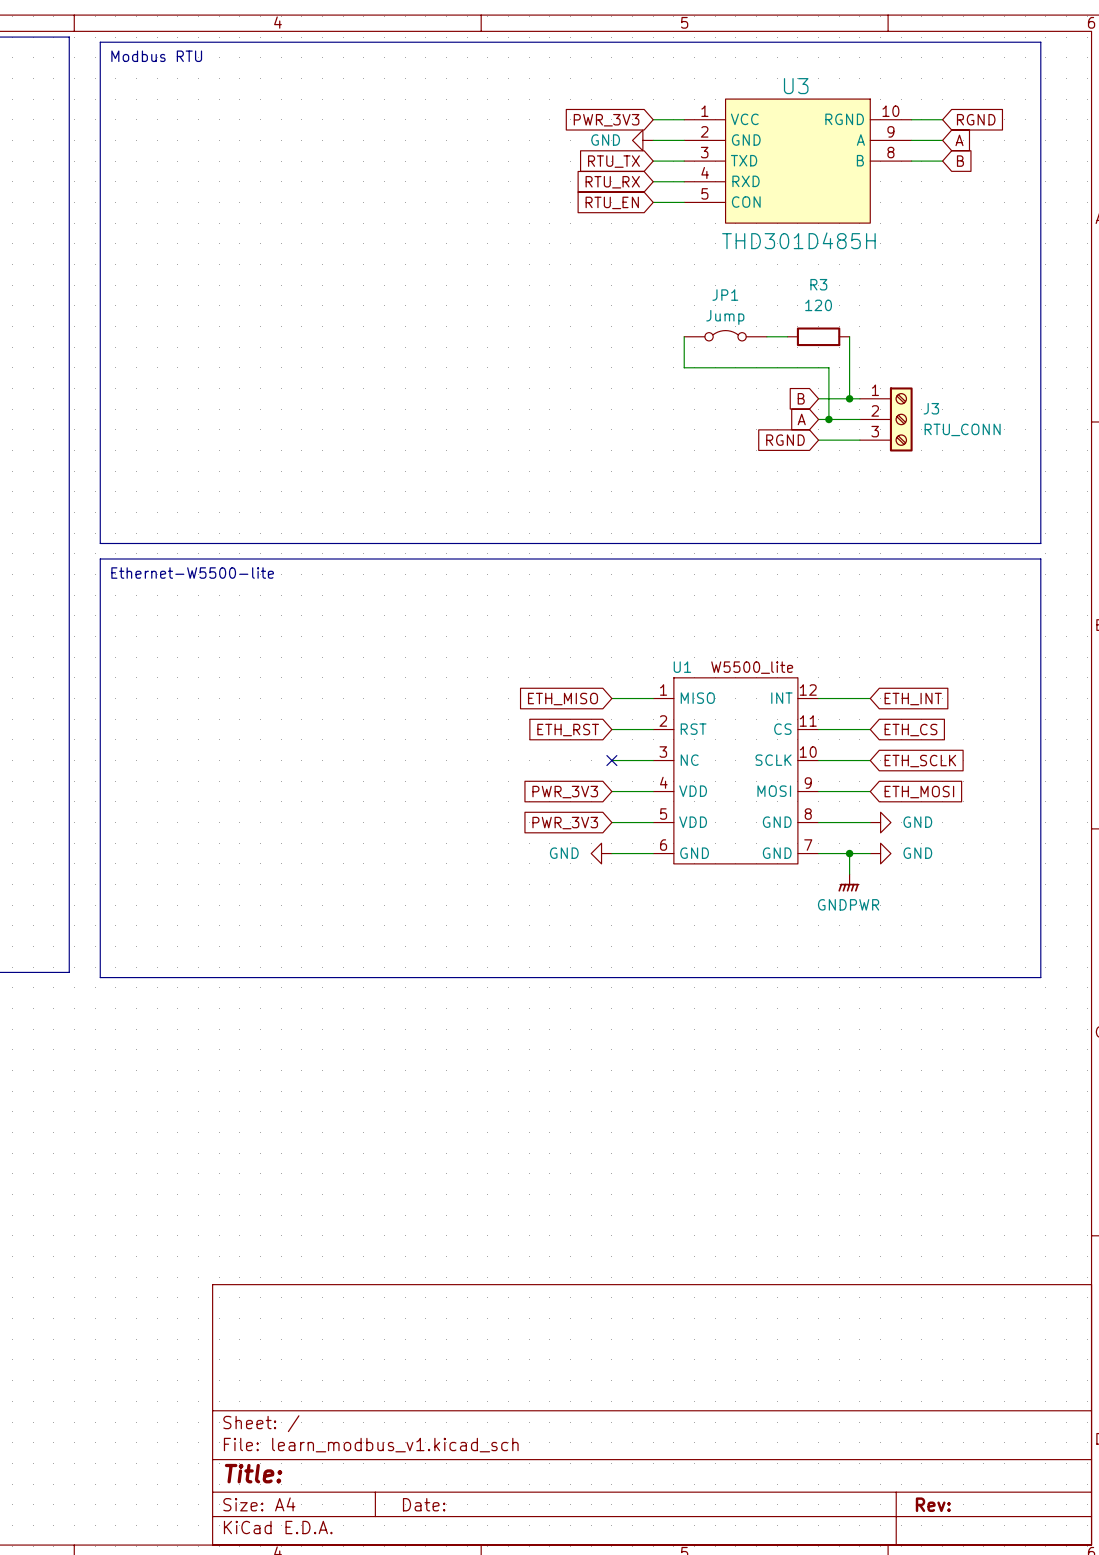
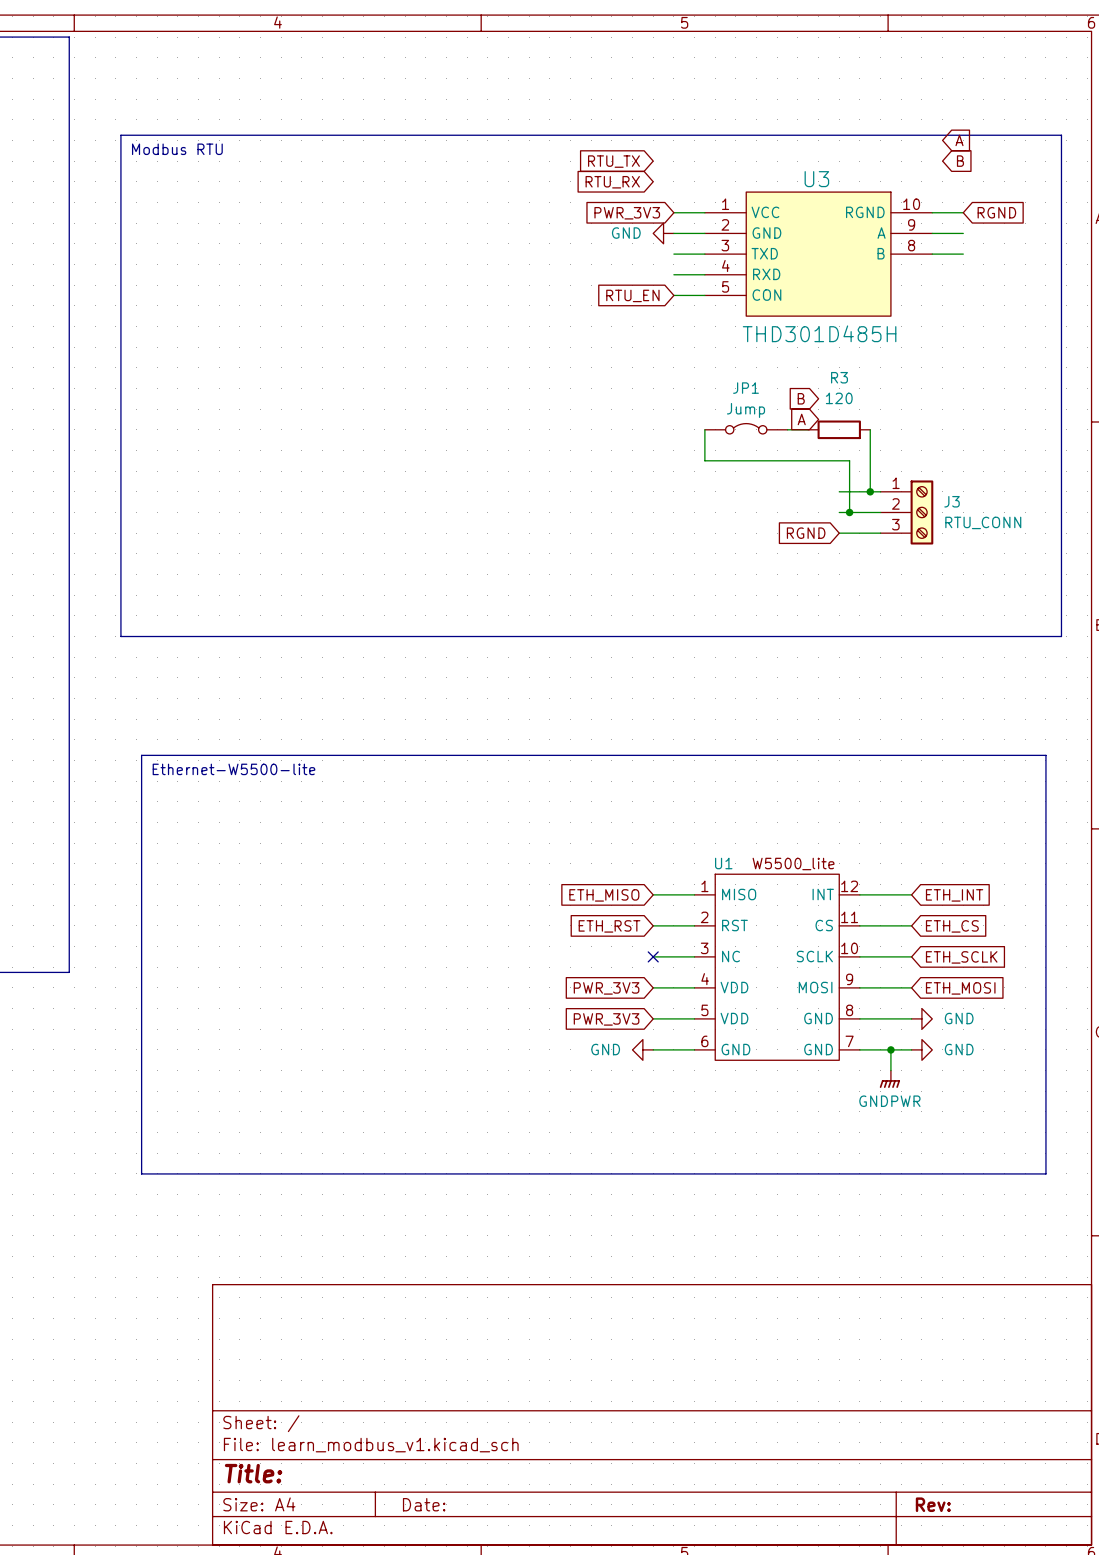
line: (100, 42) (100, 543) (1040, 543) (1040, 42) (100, 42) -> (120, 135) (120, 636) (1061, 636) (1061, 135) (120, 135)
text position: Modbus RTU (156, 56) -> Modbus RTU (177, 149)
wire: (653, 119) (684, 119) -> (673, 212) (704, 212)
wire: (911, 119) (942, 119) -> (932, 212) (963, 212)
global label position: RGND (976, 119) -> RGND (996, 212)
global label position: PWR_3V3 (606, 120) -> PWR_3V3 (627, 213)
power symbol position: GND (642, 140) -> GND (663, 233)
wire: (653, 140) (684, 140) -> (673, 233) (704, 233)
wire: (911, 140) (942, 140) -> (932, 233) (963, 233)
wire: (653, 161) (684, 161) -> (673, 254) (704, 254)
U3 position: (797, 161) -> (818, 254)
wire: (911, 161) (942, 161) -> (932, 254) (963, 254)
wire: (653, 181) (684, 181) -> (673, 274) (704, 274)
global label position: RTU_EN (612, 202) -> RTU_EN (632, 295)
wire: (653, 202) (684, 202) -> (673, 295) (704, 295)
JP1 position: (725, 335) -> (746, 428)
wire: (684, 336) (684, 367) (828, 367) (828, 419) -> (704, 429) (704, 460) (849, 460) (849, 512)
R3 position: (818, 336) -> (839, 429)
wire: (849, 336) (849, 398) -> (870, 429) (870, 491)
wire: (818, 398) (859, 398) -> (839, 491) (880, 491)
junction: (849, 398) -> none
wire: (818, 419) (859, 419) -> (839, 512) (880, 512)
junction: (828, 419) -> none
J3 position: (886, 419) -> (906, 512)
global label position: RGND (785, 440) -> RGND (806, 533)
wire: (818, 440) (859, 440) -> (839, 533) (880, 533)
junction: none -> (870, 491)
junction: none -> (849, 512)
line: (100, 558) (1040, 558) (1040, 977) (100, 977) (100, 558) -> none
text position: Ethernet-W5500-lite (192, 573) -> Ethernet-W5500-lite (233, 769)
wire: (611, 698) (653, 698) -> (653, 894) (694, 894)
wire: (818, 698) (870, 698) -> (859, 894) (911, 894)
global label position: ETH_MISO (563, 699) -> ETH_MISO (604, 895)
global label position: ETH_INT (913, 699) -> ETH_INT (954, 895)
wire: (611, 729) (653, 729) -> (653, 925) (694, 925)
wire: (818, 729) (870, 729) -> (859, 925) (911, 925)
global label position: ETH_RST (568, 730) -> ETH_RST (609, 926)
global label position: ETH_CS (911, 730) -> ETH_CS (952, 926)
line: none -> (141, 755) (1045, 755) (1045, 1173) (141, 1173) (141, 755)
wire: (611, 760) (653, 760) -> (653, 956) (694, 956)
no-connect mark: (611, 760) -> none
wire: (818, 760) (870, 760) -> (859, 956) (911, 956)
global label position: ETH_SCLK (920, 761) -> ETH_SCLK (961, 957)
U1 position: (735, 770) -> (777, 967)
wire: (611, 791) (653, 791) -> (653, 987) (694, 987)
wire: (818, 791) (870, 791) -> (859, 987) (911, 987)
global label: PWR_3V3 (565, 792) -> none
global label position: ETH_MOSI (919, 792) -> ETH_MOSI (960, 988)
wire: (611, 822) (653, 822) -> (653, 1018) (694, 1018)
wire: (818, 822) (870, 822) -> (859, 1018) (911, 1018)
power symbol: GND (880, 822) -> none
global label: PWR_3V3 (565, 823) -> none
power symbol: GND (601, 853) -> none
wire: (611, 853) (653, 853) -> (653, 1049) (694, 1049)
wire: (818, 853) (870, 853) -> (859, 1049) (911, 1049)
wire: (849, 853) (849, 874) -> (890, 1049) (890, 1070)
junction: (849, 853) -> none
power symbol: GND (880, 853) -> none
power symbol position: GNDPWR (848, 882) -> GNDPWR (889, 1079)
no-connect mark: none -> (653, 956)
global label: none -> PWR_3V3 (606, 988)
power symbol: none -> GND (921, 1018)
global label: none -> PWR_3V3 (606, 1019)
power symbol: none -> GND (642, 1049)
junction: none -> (890, 1049)
power symbol: none -> GND (921, 1049)

